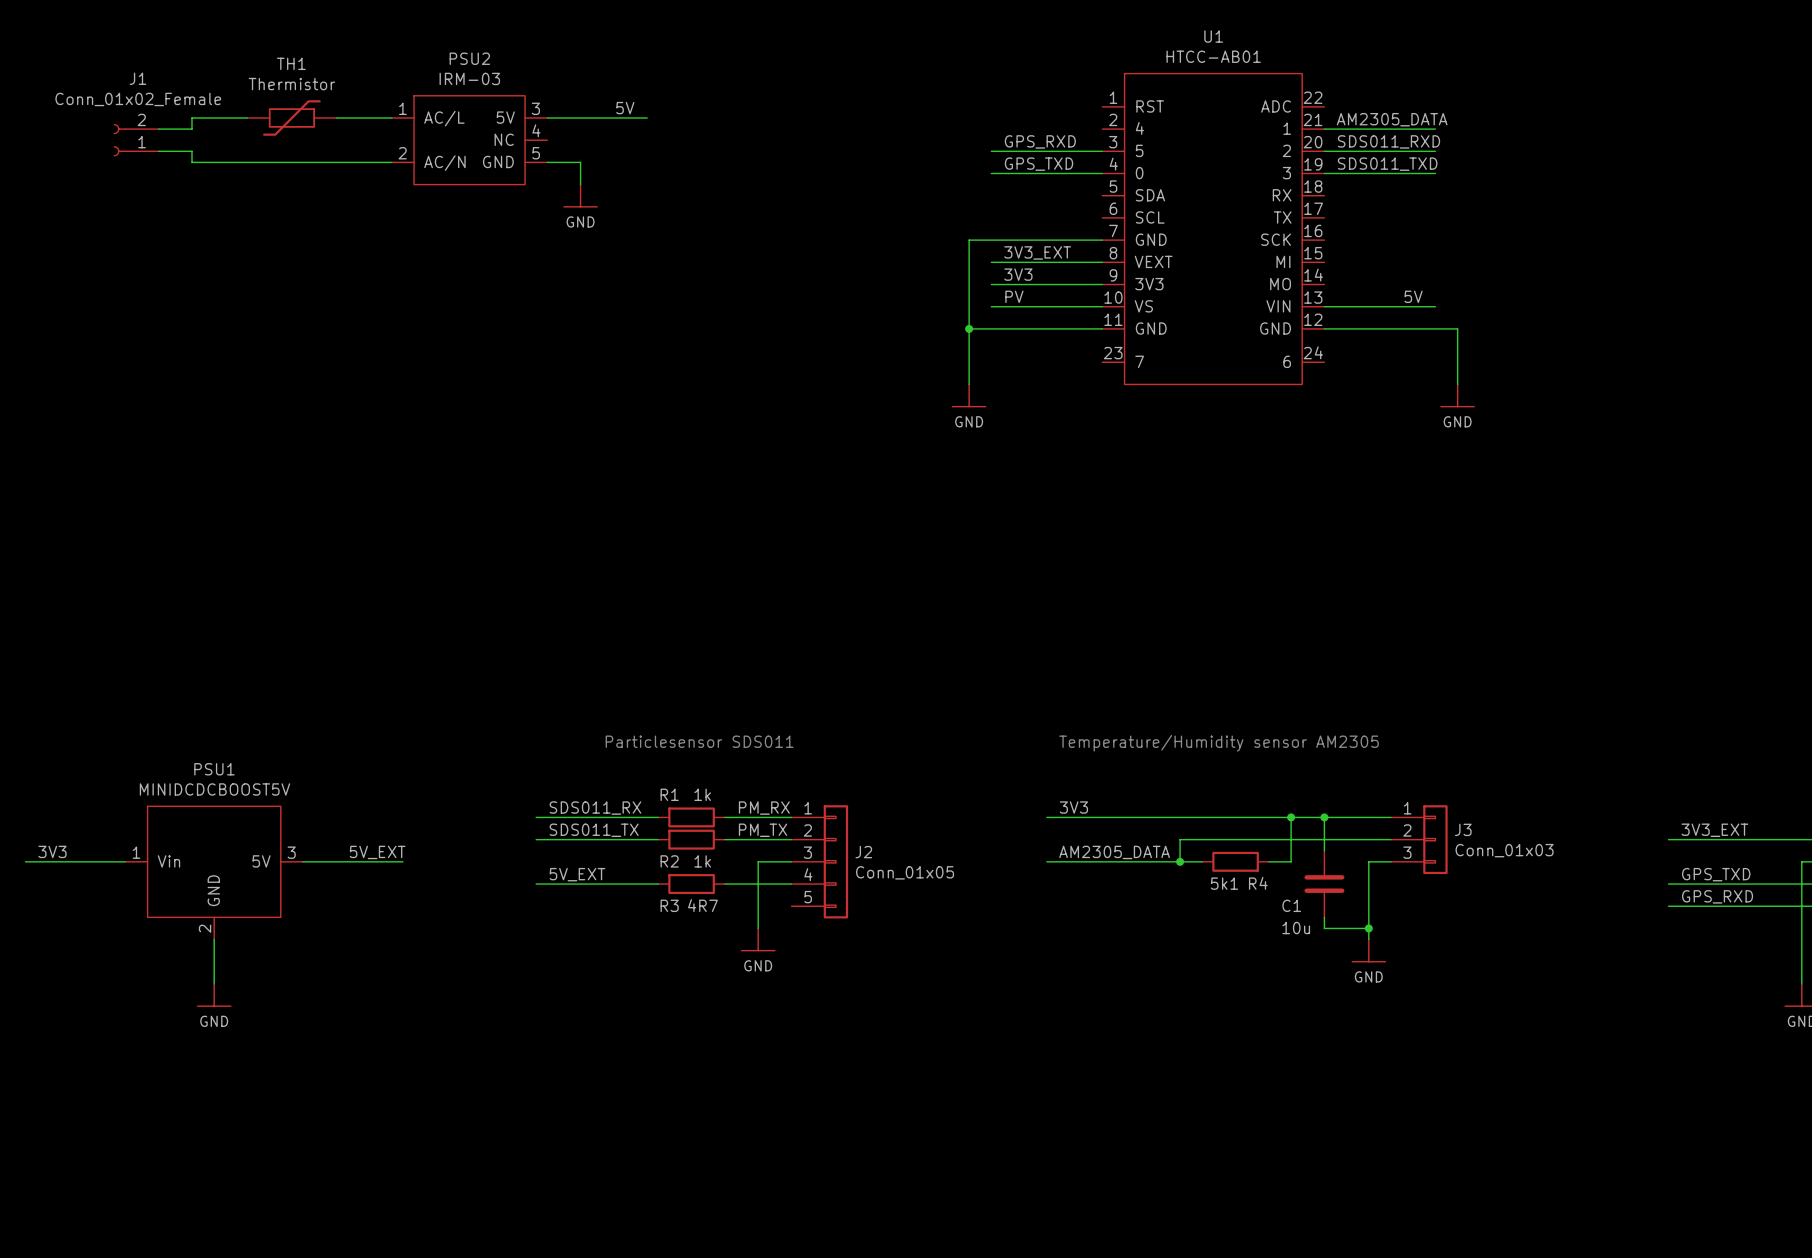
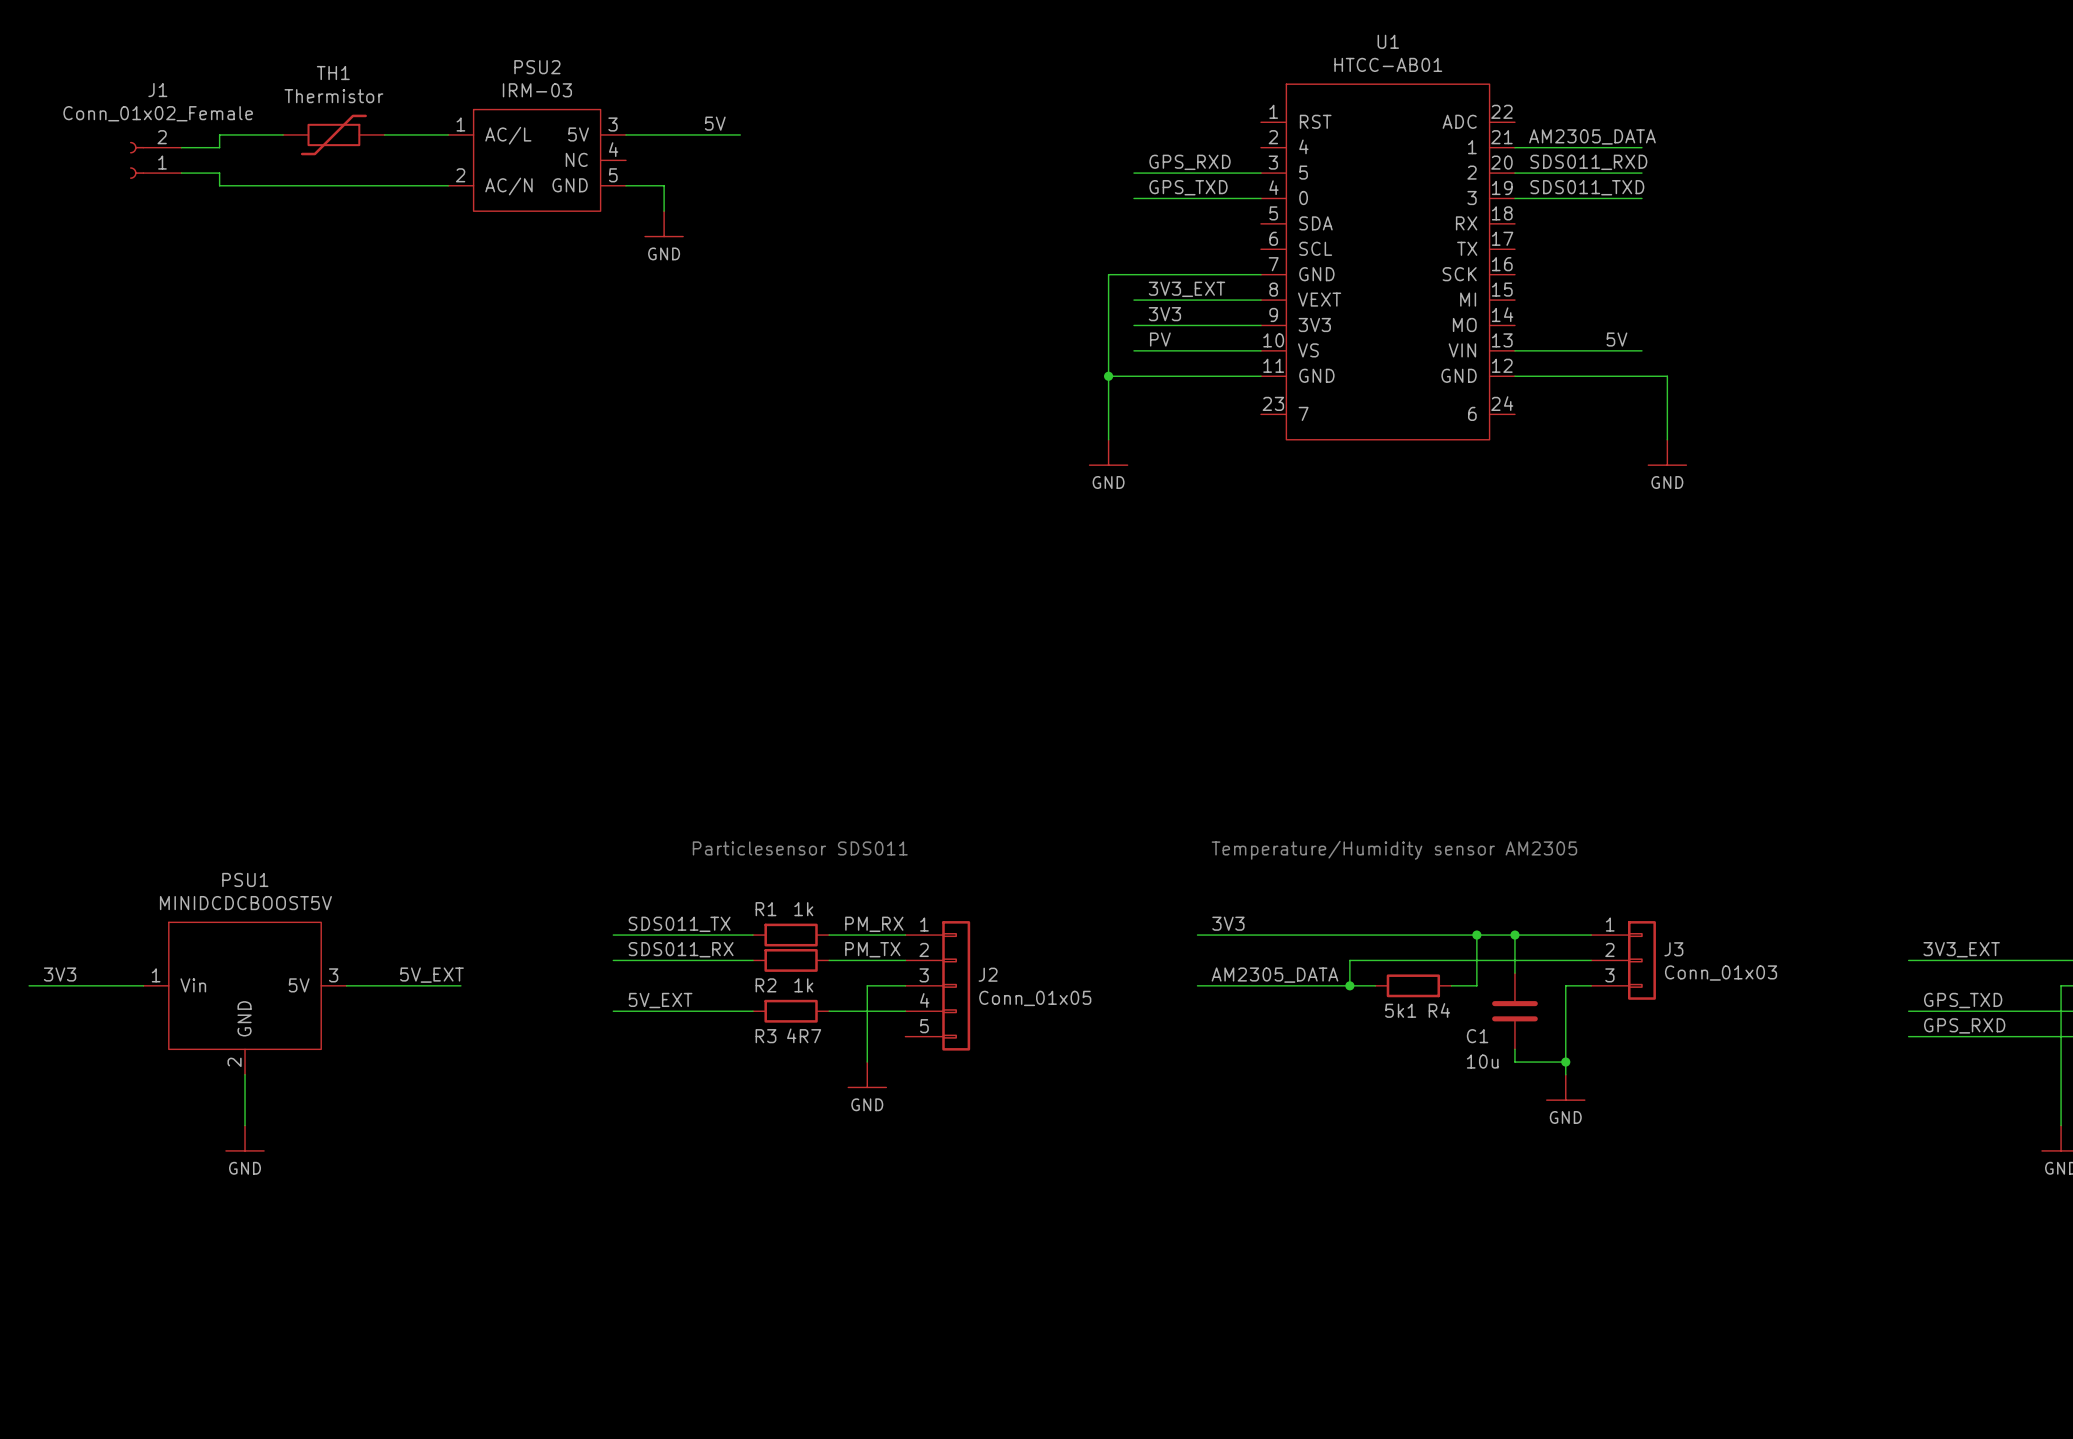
label: SDS011_RX (595, 808) -> SDS011_TX (679, 924)
label: SDS011_TX (594, 830) -> SDS011_RX (681, 949)

